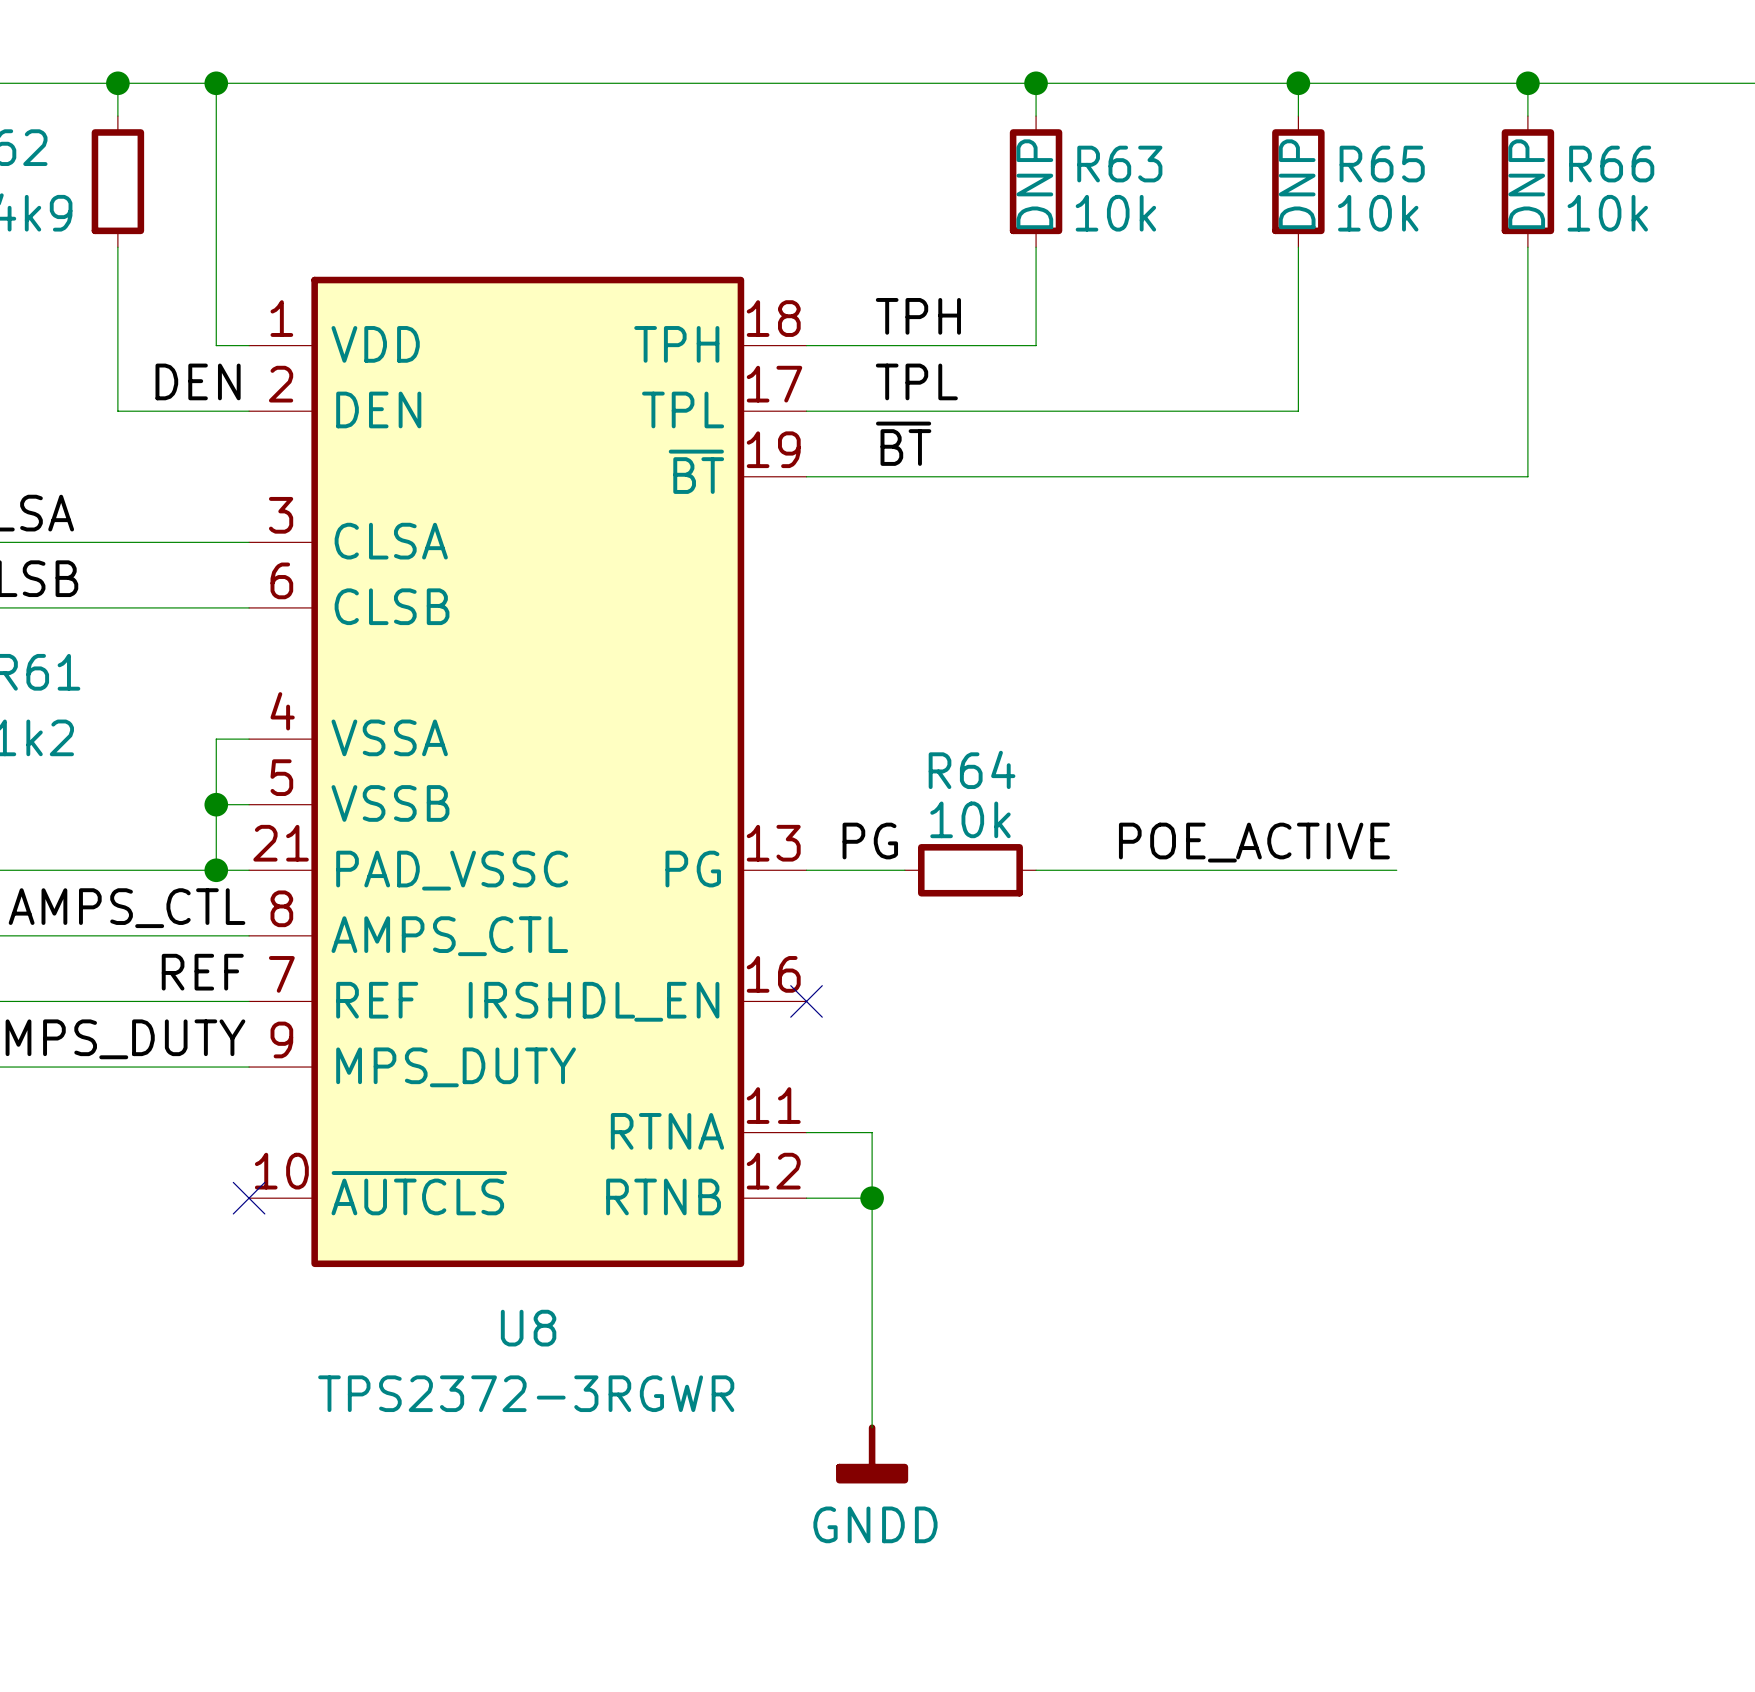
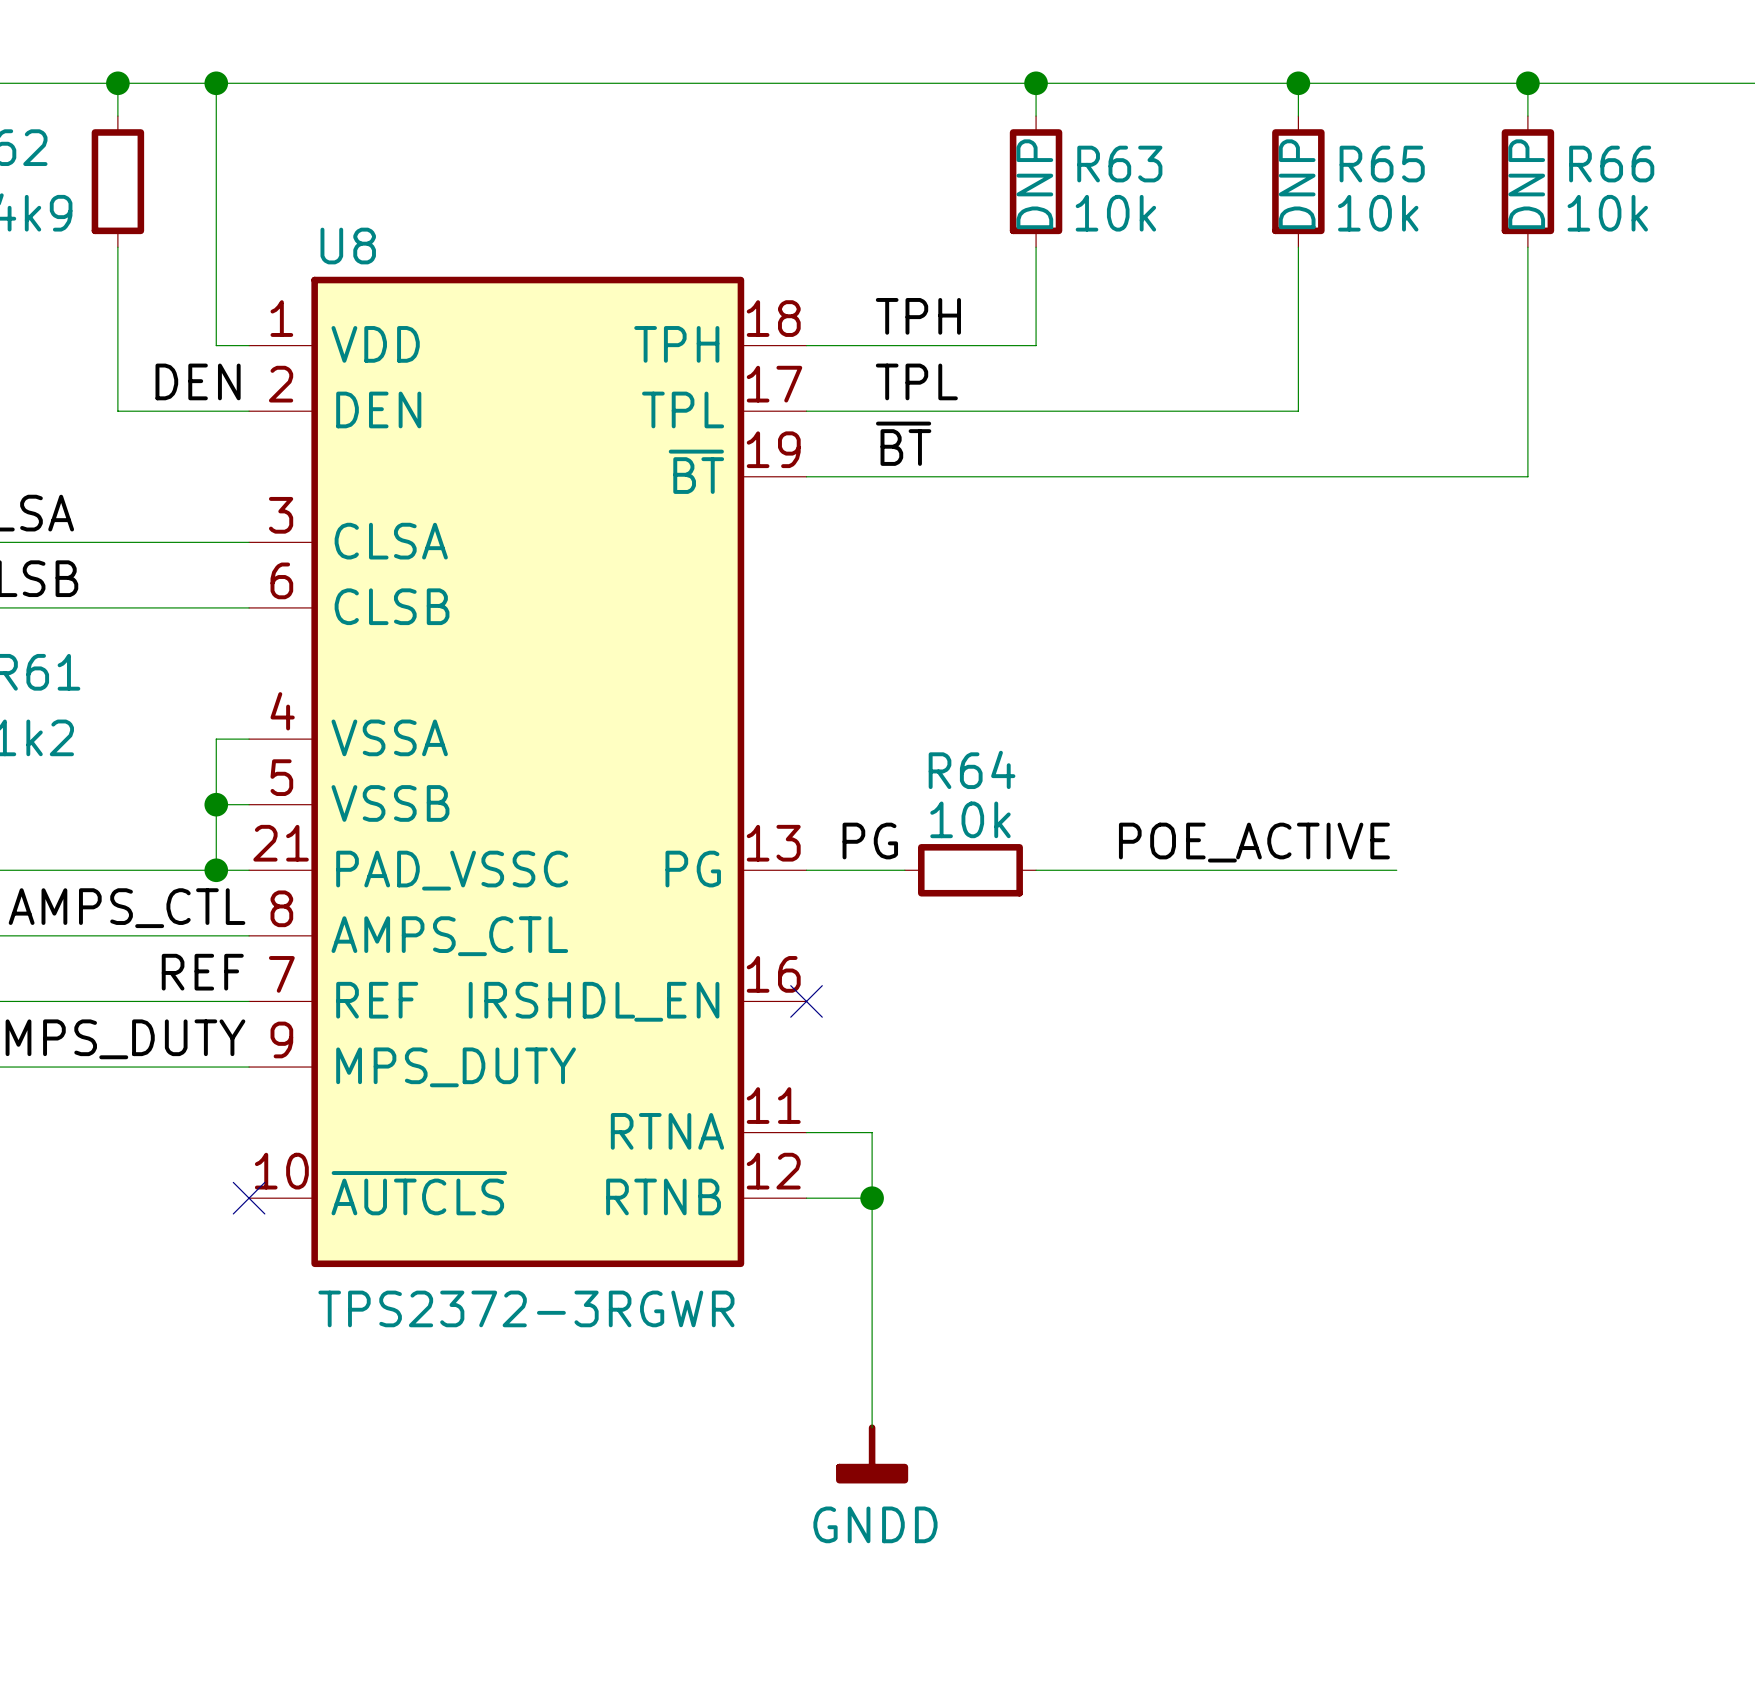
U8 text: none -> TPS2372-3RGWR (526, 1308)
U8 name position: U8 (528, 1328) -> U8 (348, 246)
U8 value: TPS2372-3RGWR (526, 1393) -> none

